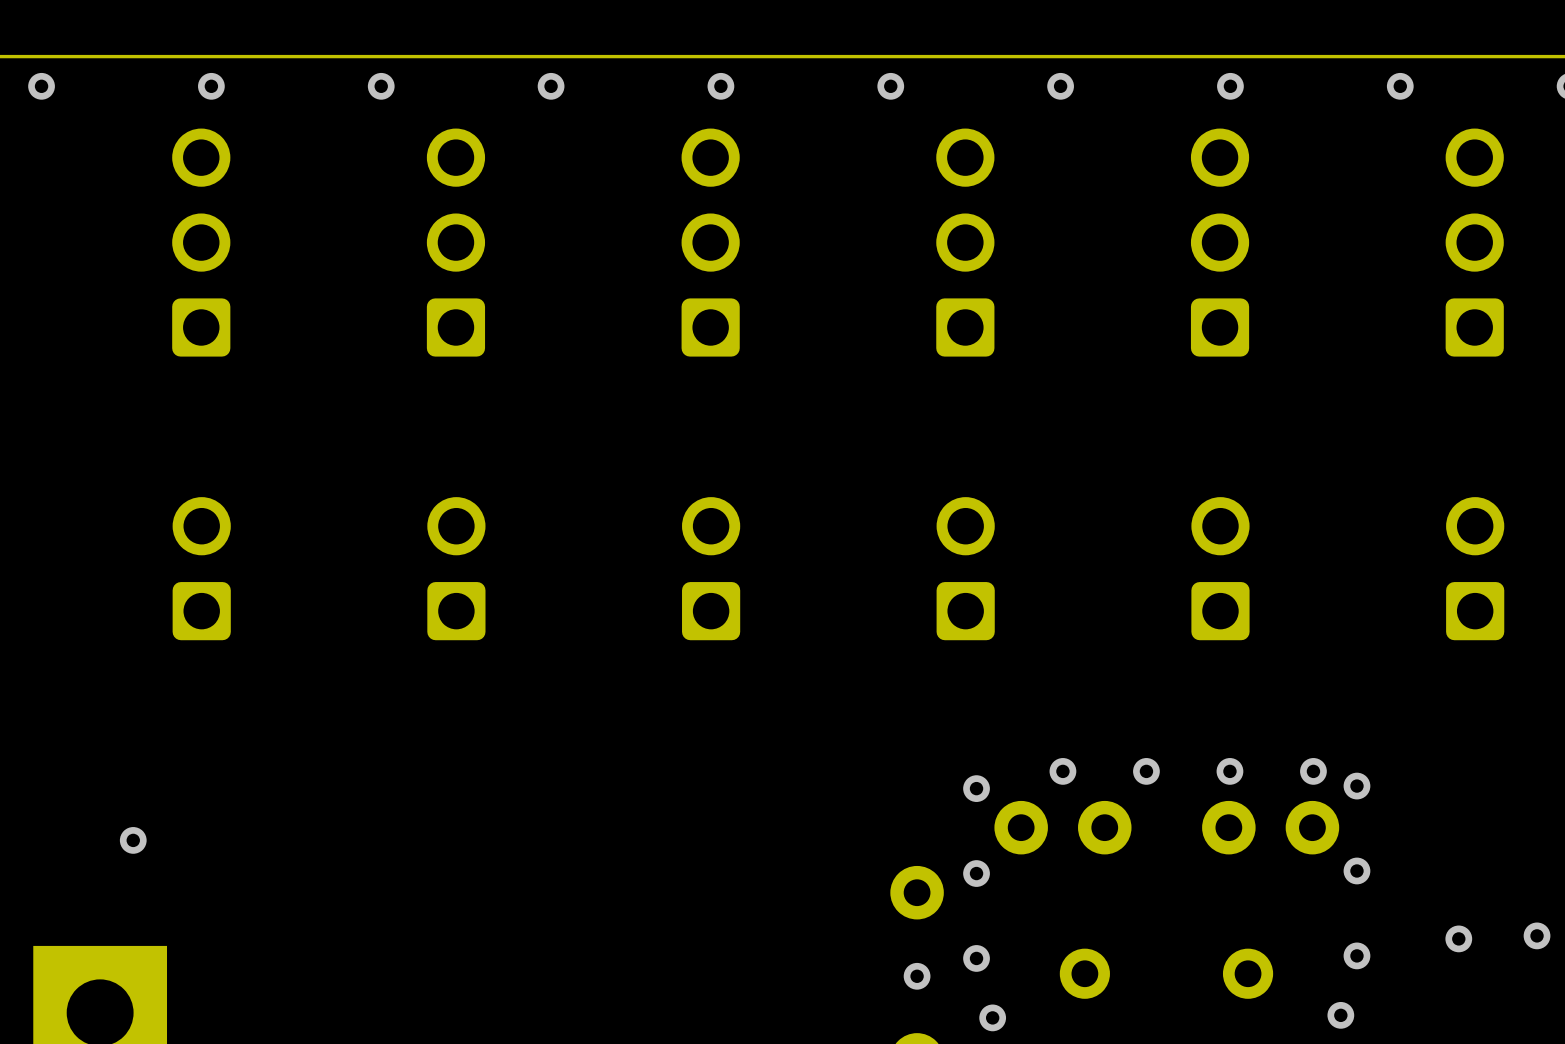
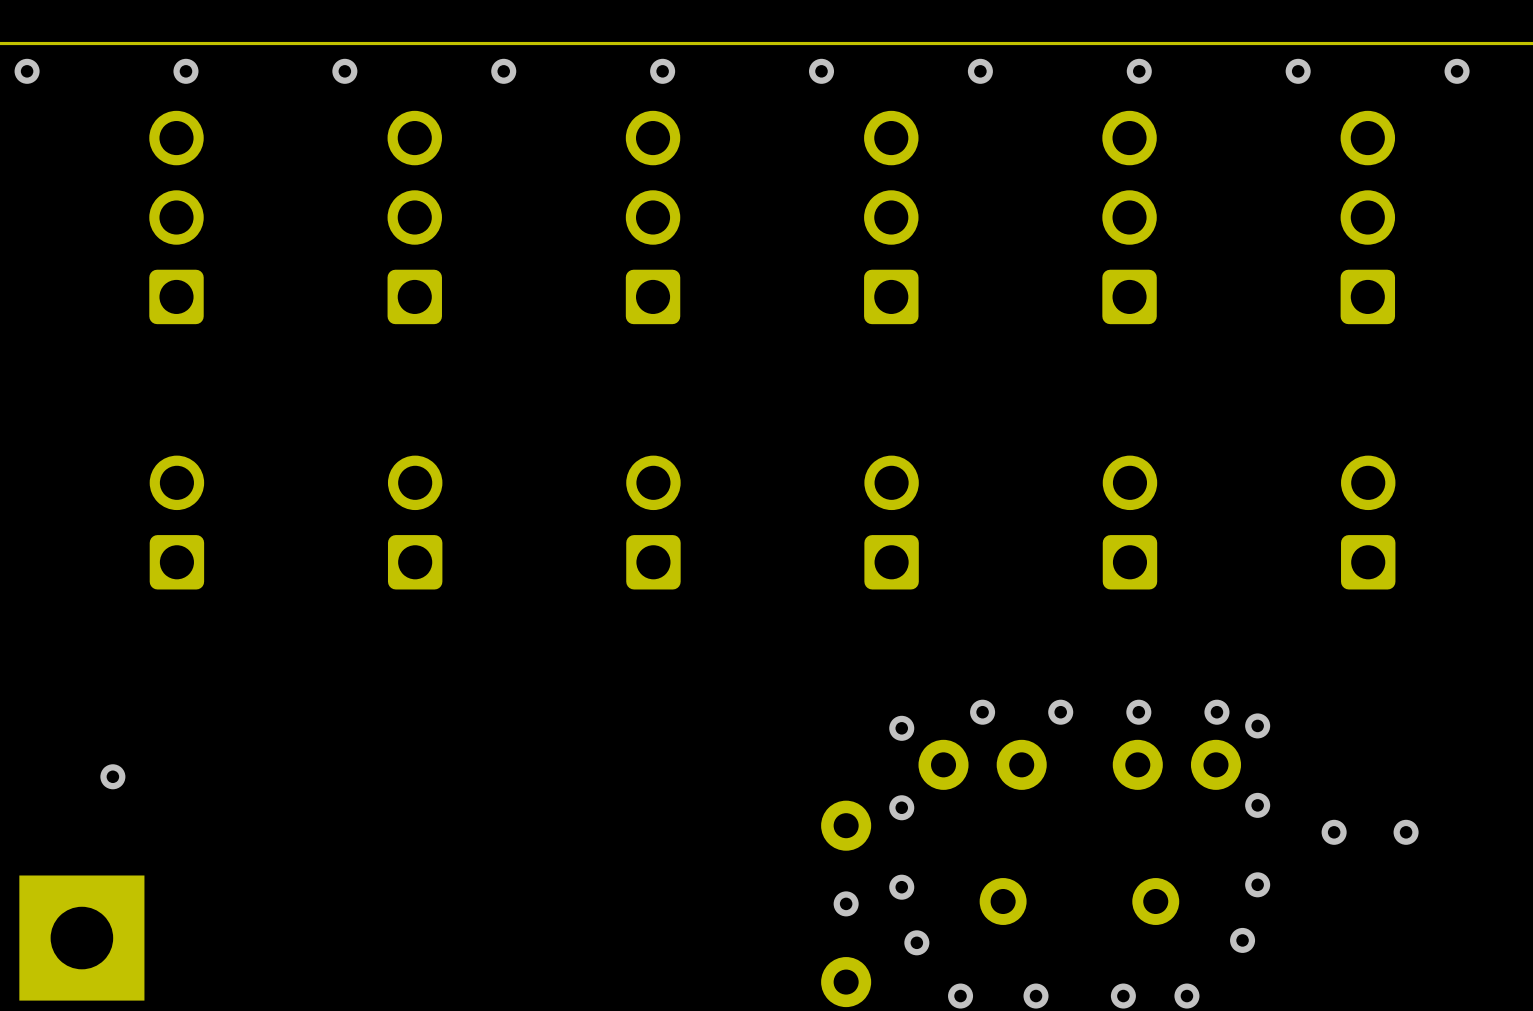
via: none -> (1334, 832)
via: none -> (1406, 832)
via: (1537, 935) -> none
via: (1458, 938) -> none

